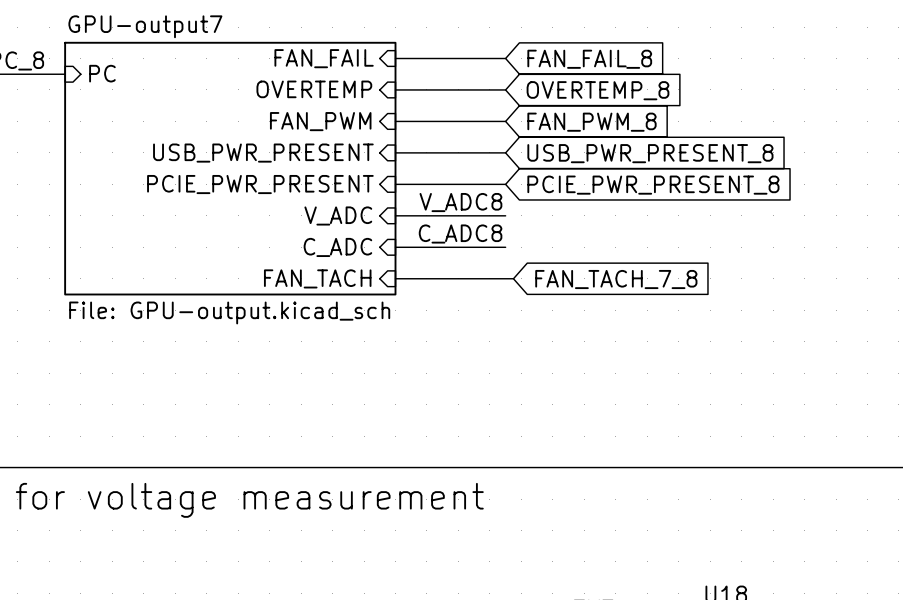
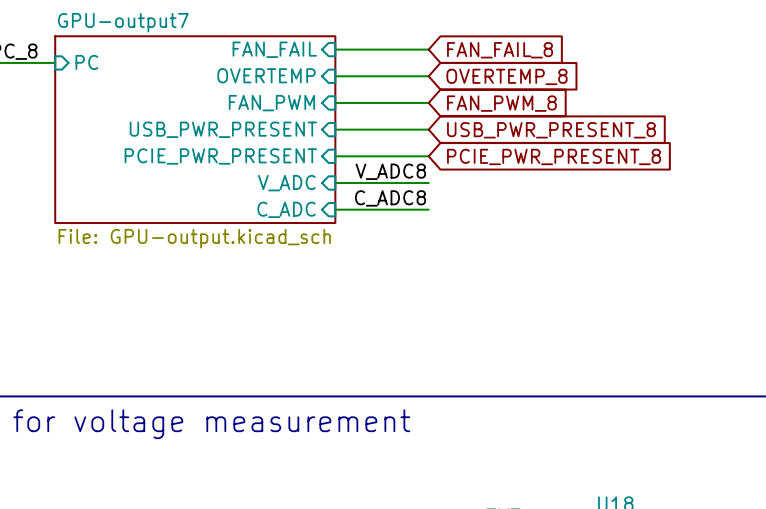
sheet GPU-output7 shape: [64, 41, 397, 296] -> [54, 35, 337, 224]
sheet pin: FAN_TACH (317, 278) -> none
wire: (395, 278) (513, 278) -> none
global label: FAN_TACH_7_8 (616, 279) -> none

